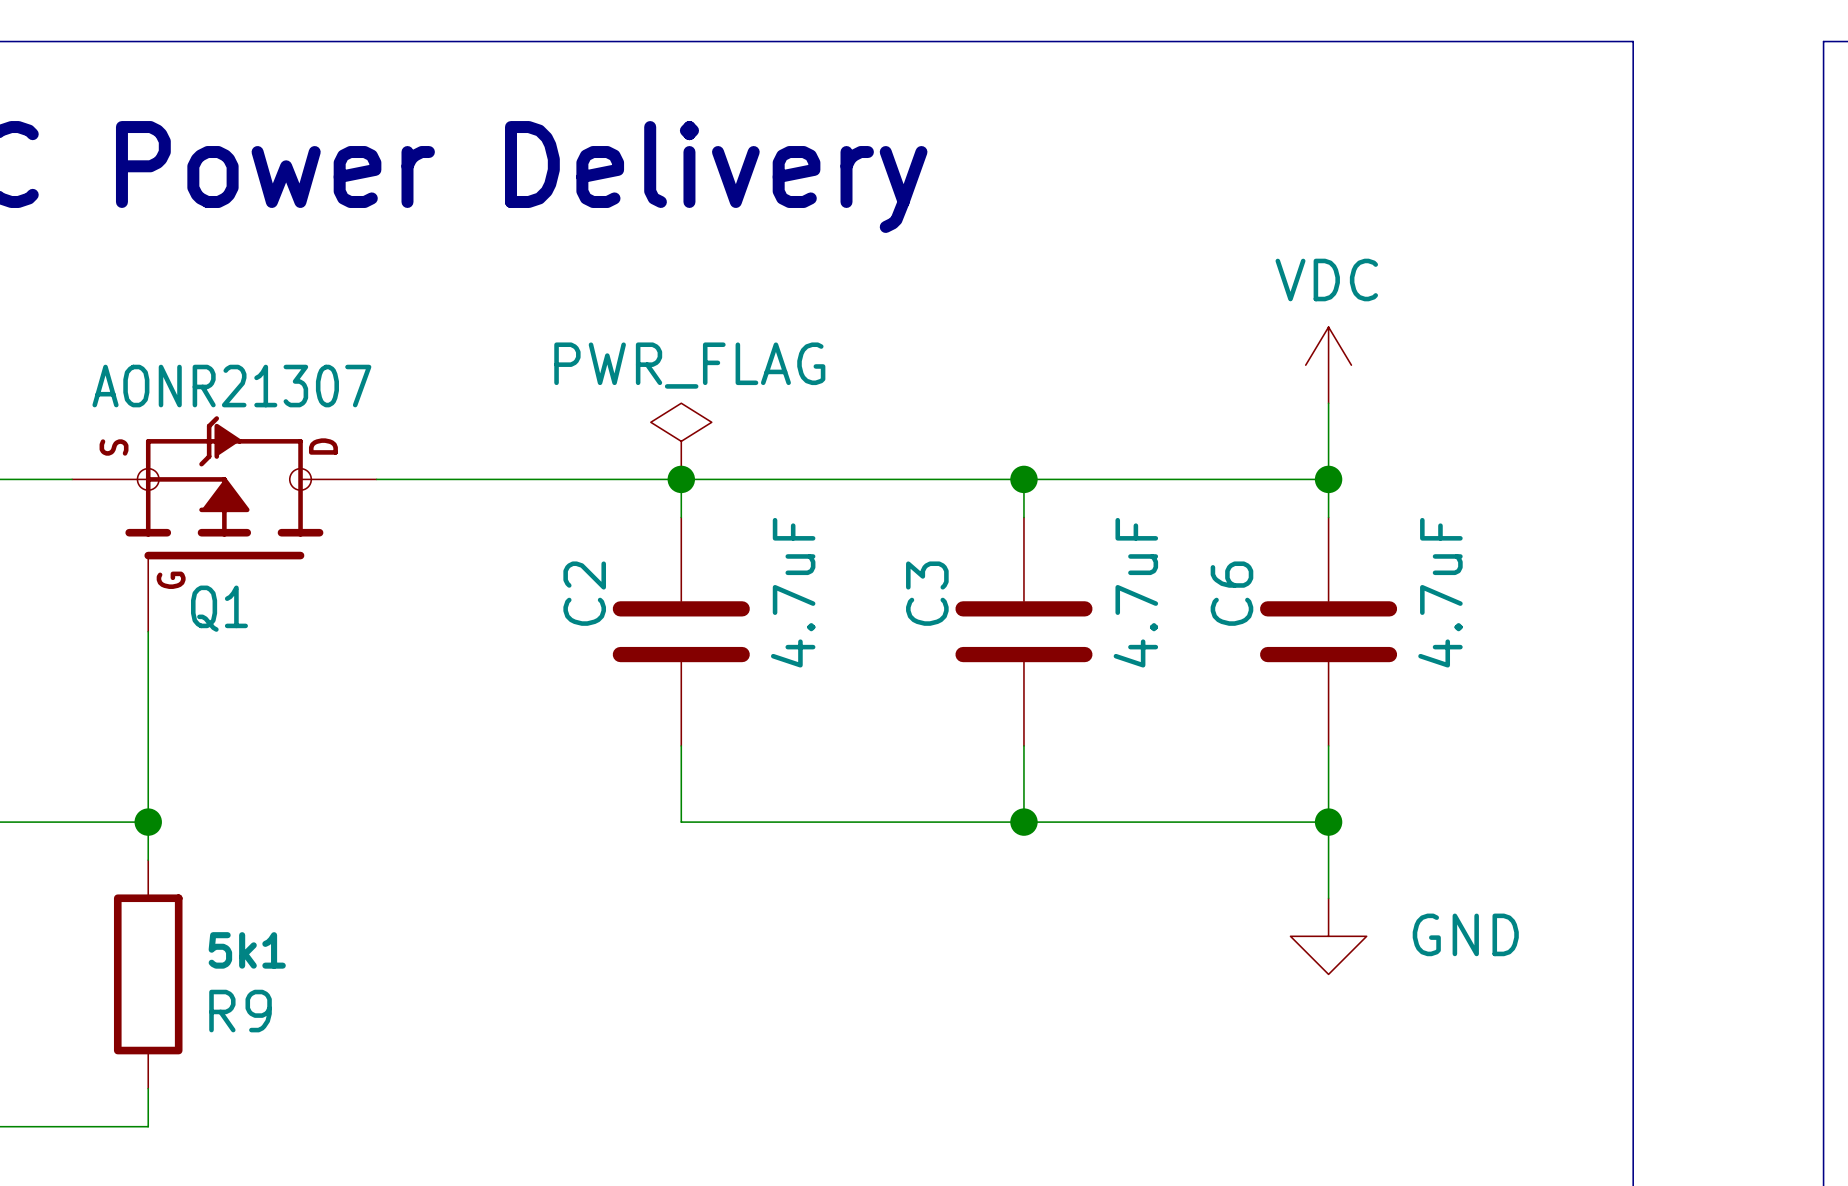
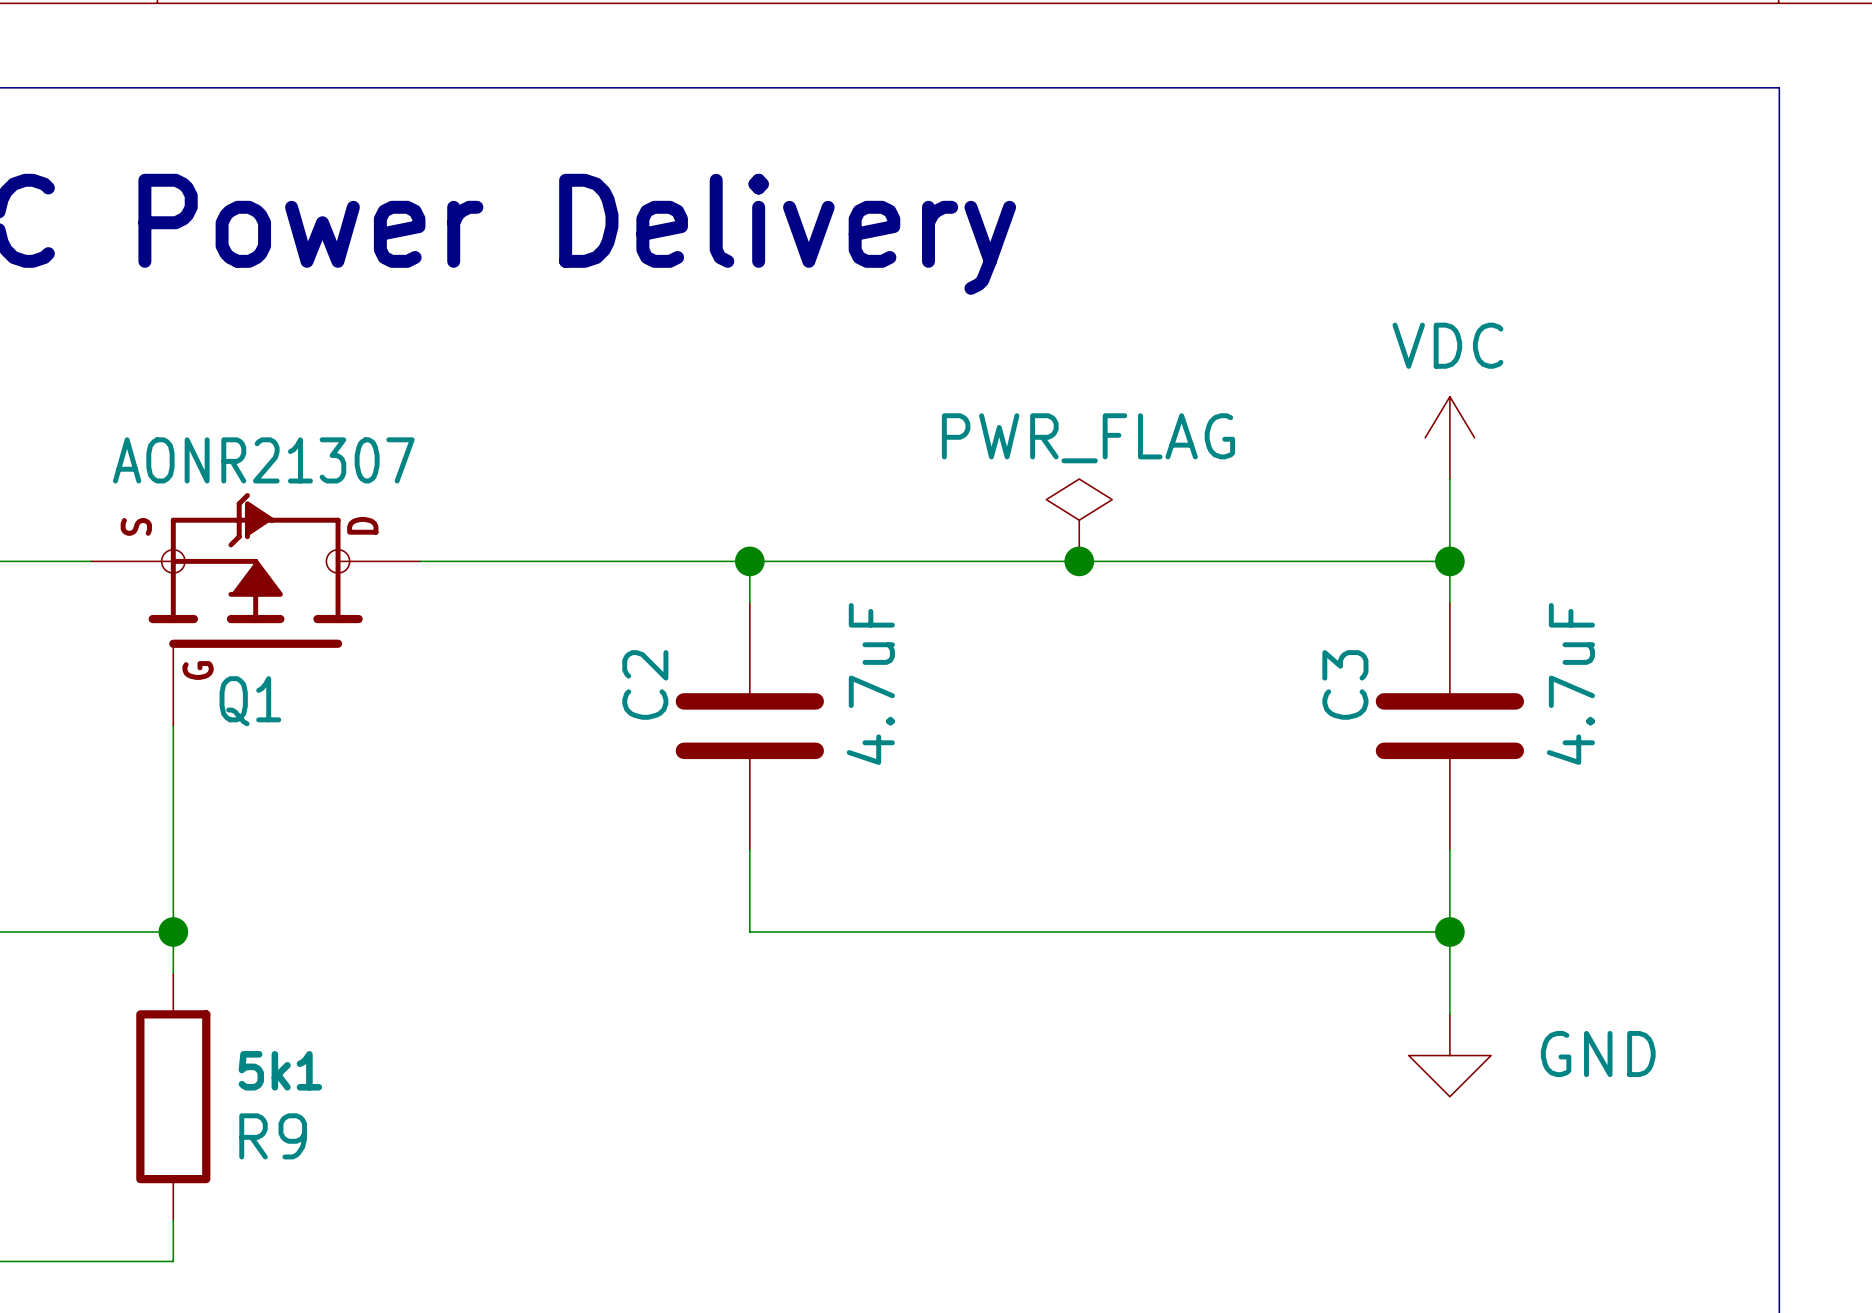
power symbol position: PWR_FLAG (681, 441) -> PWR_FLAG (1079, 520)
wire: (1023, 479) (1023, 517) -> none
junction position: (1023, 479) -> (1079, 561)
C6 name: C6 (1231, 593) -> C3 (1345, 684)
C3: 4.7uF (1023, 631) -> none
wire: (1023, 745) (1023, 822) -> none
junction: (1023, 822) -> none

